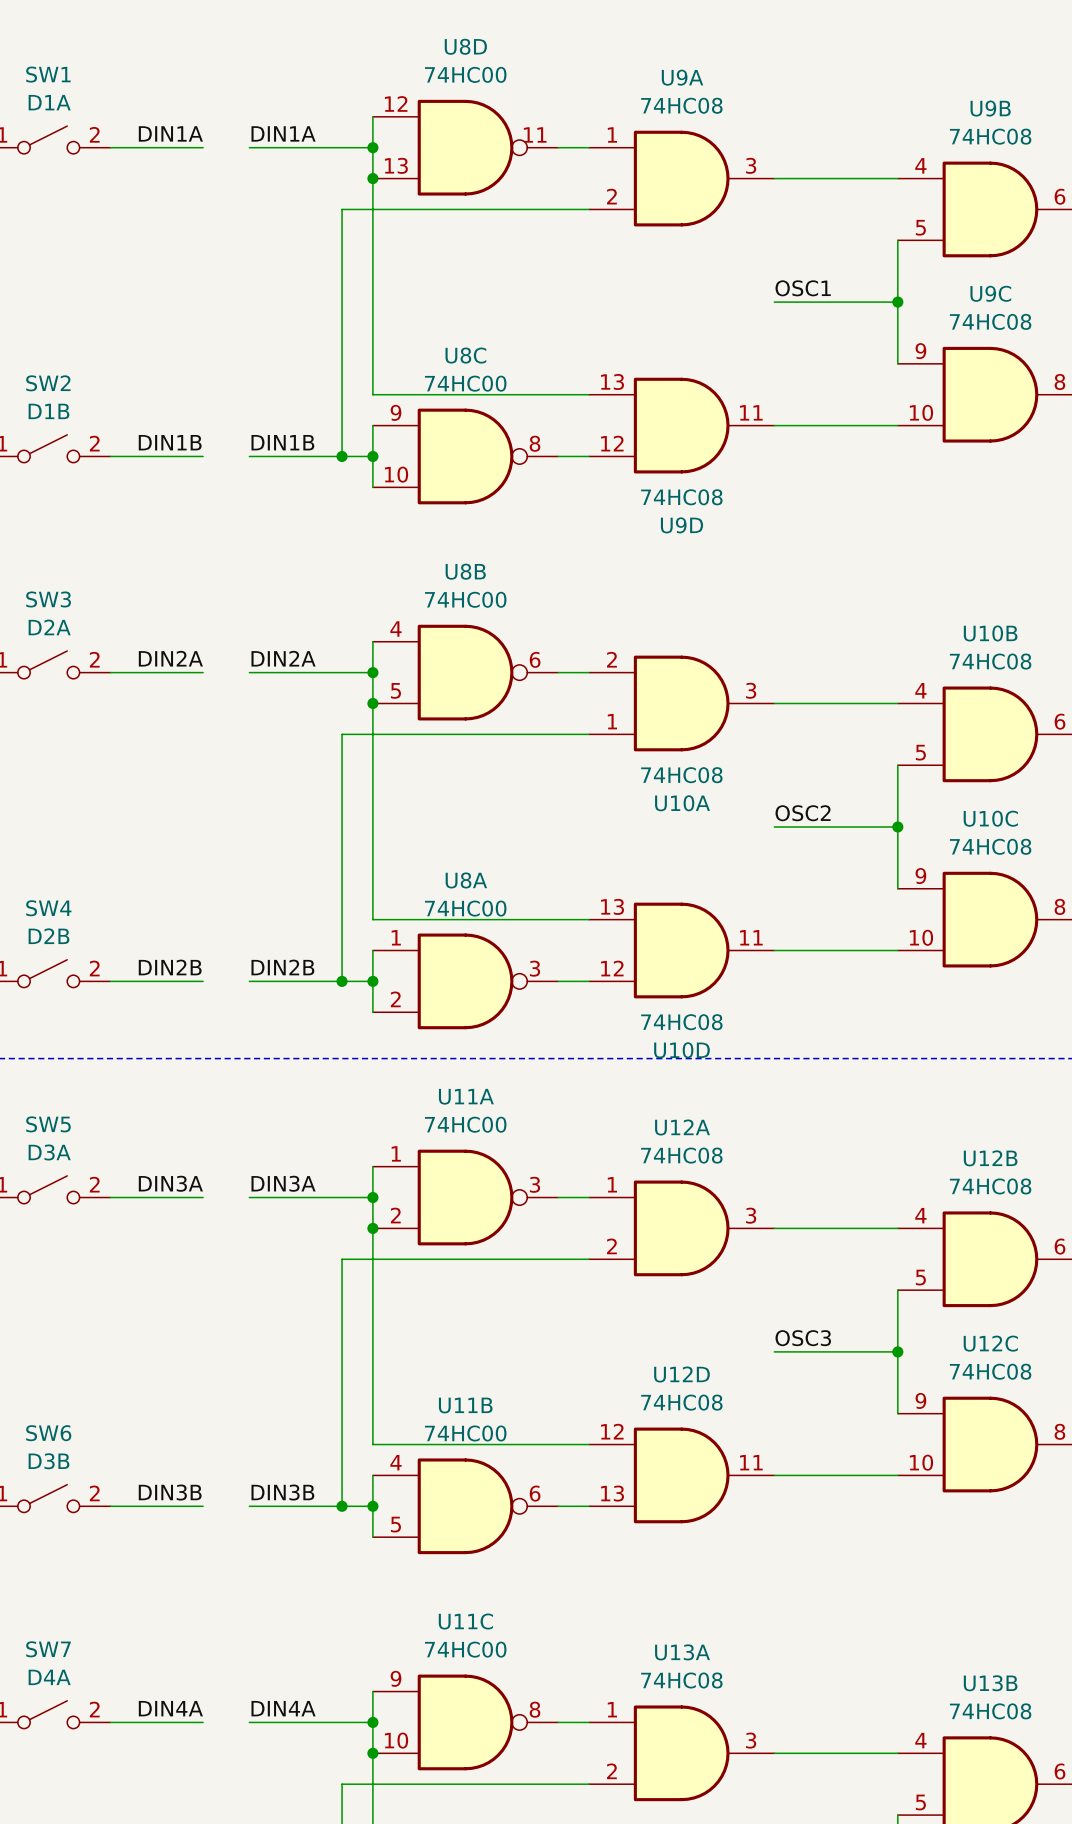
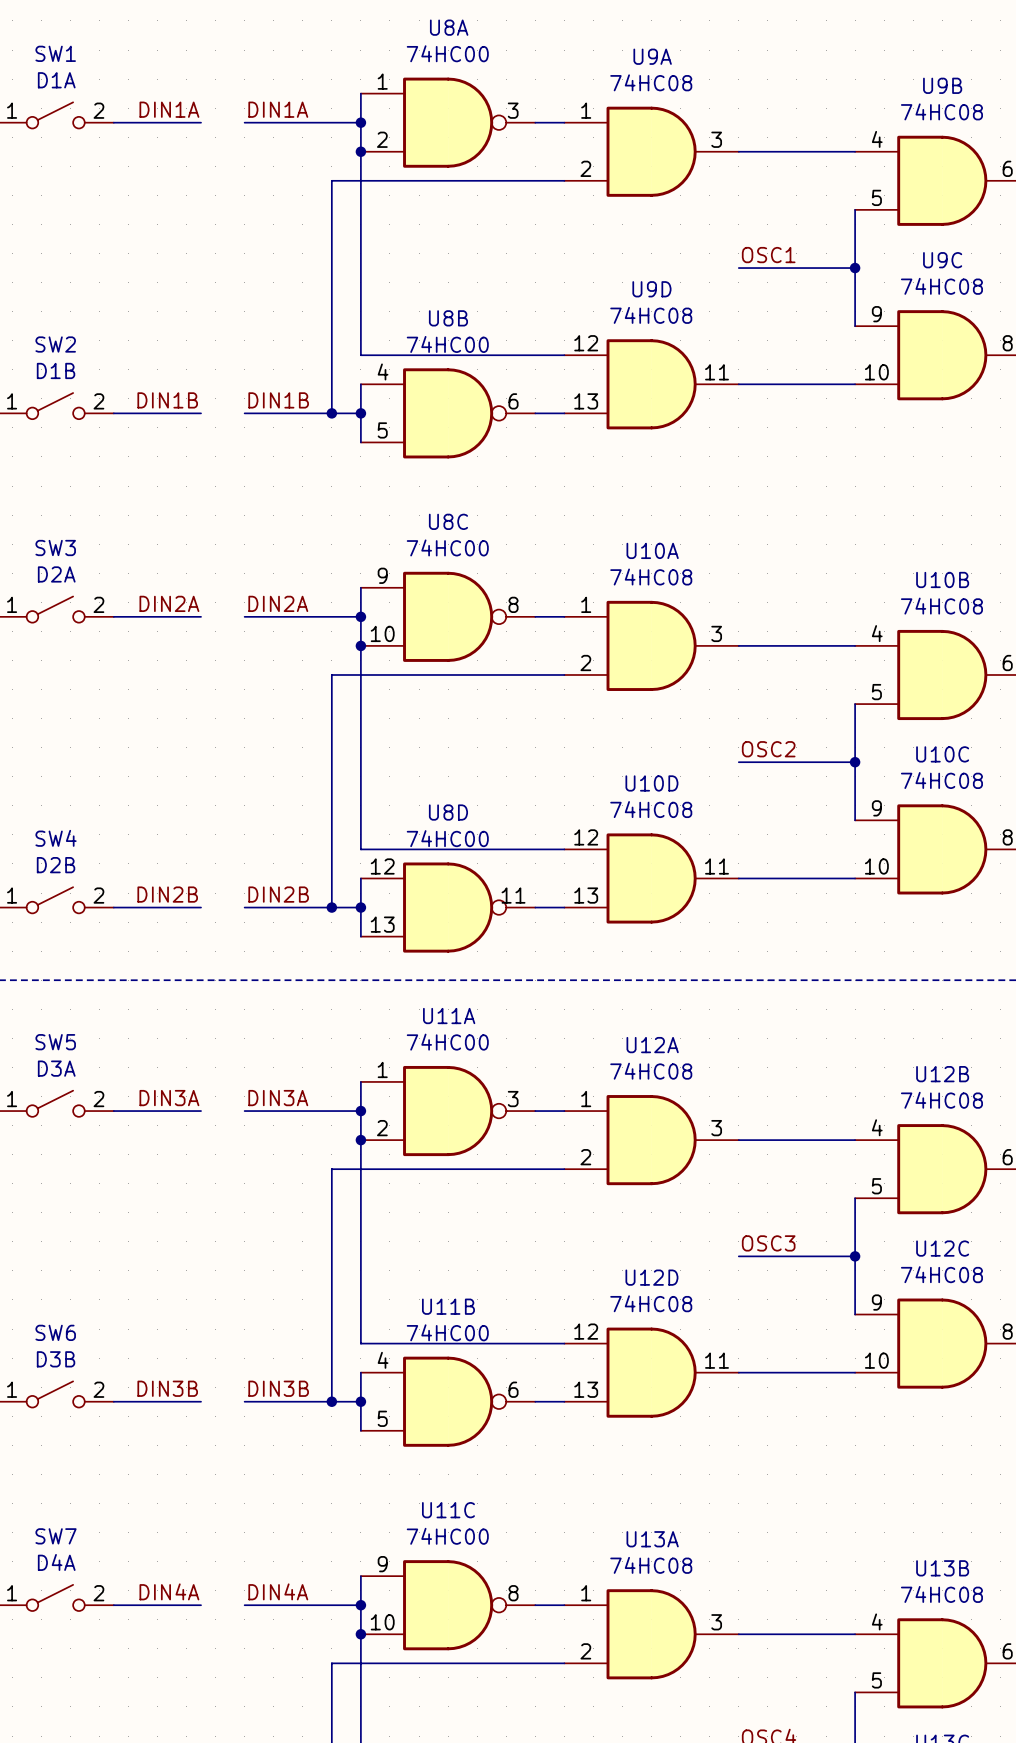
U8D position: (465, 147) -> (448, 907)
U9D flip: as is (681, 425) -> up-down (651, 384)
U8C position: (465, 456) -> (448, 616)
U8B position: (465, 672) -> (448, 413)
U10A flip: as is (681, 703) -> up-down (651, 645)
U10D flip: as is (681, 950) -> up-down (651, 878)
U8A position: (465, 981) -> (448, 122)

